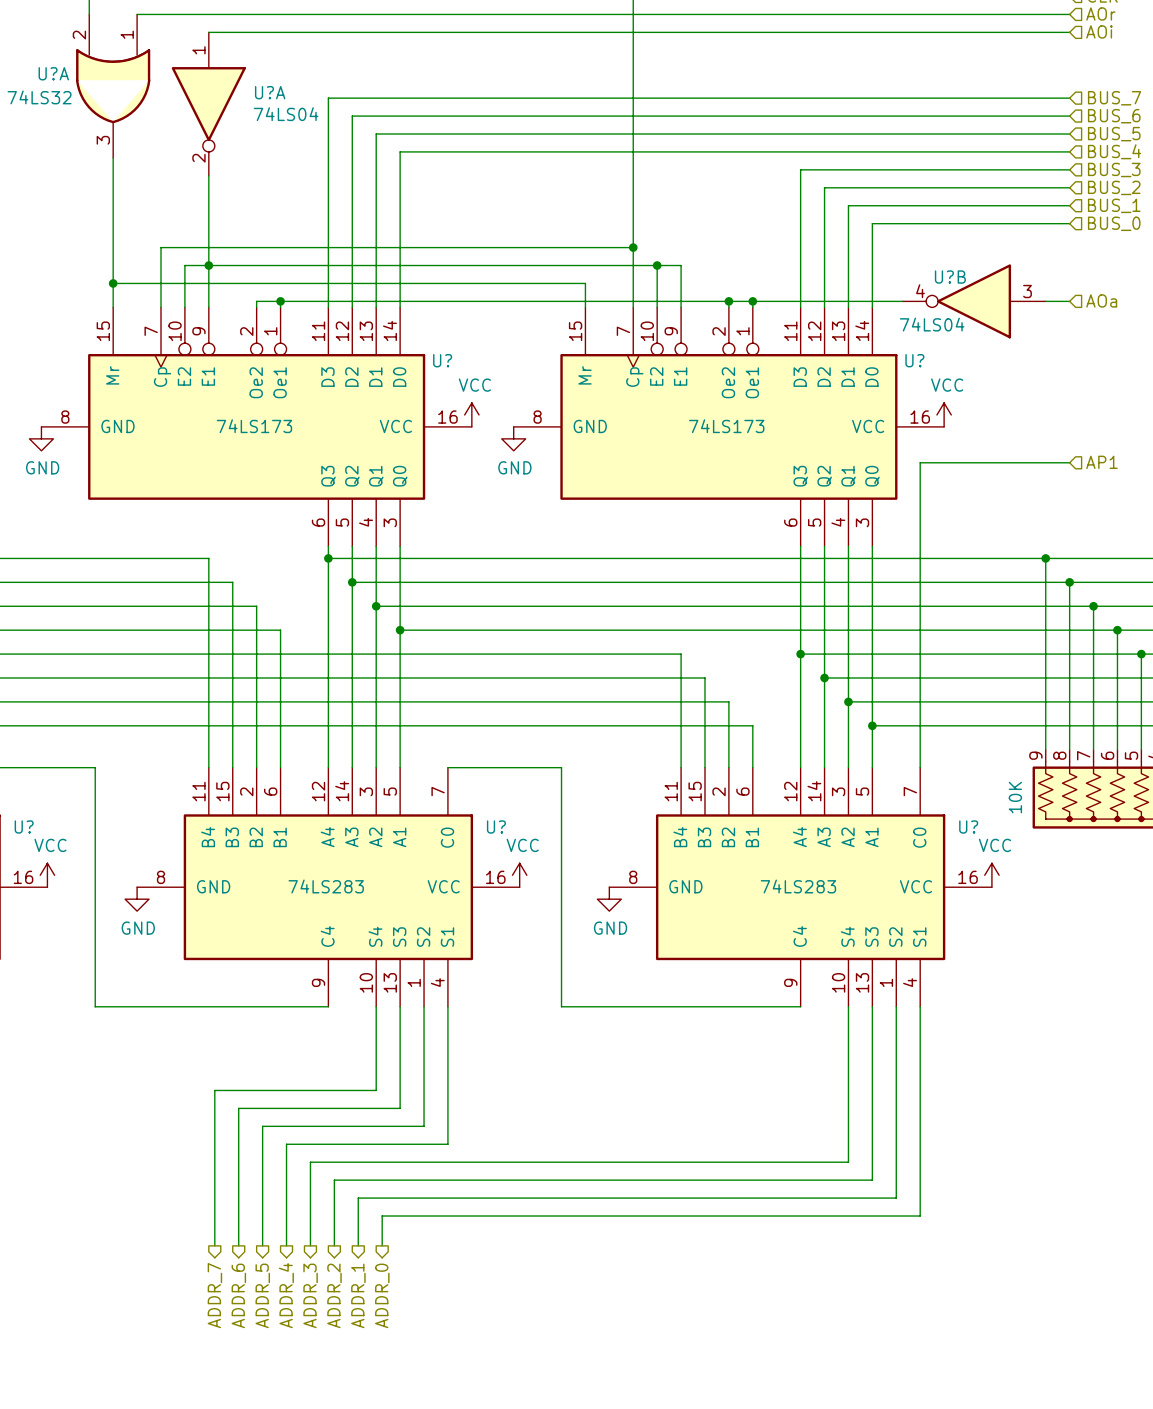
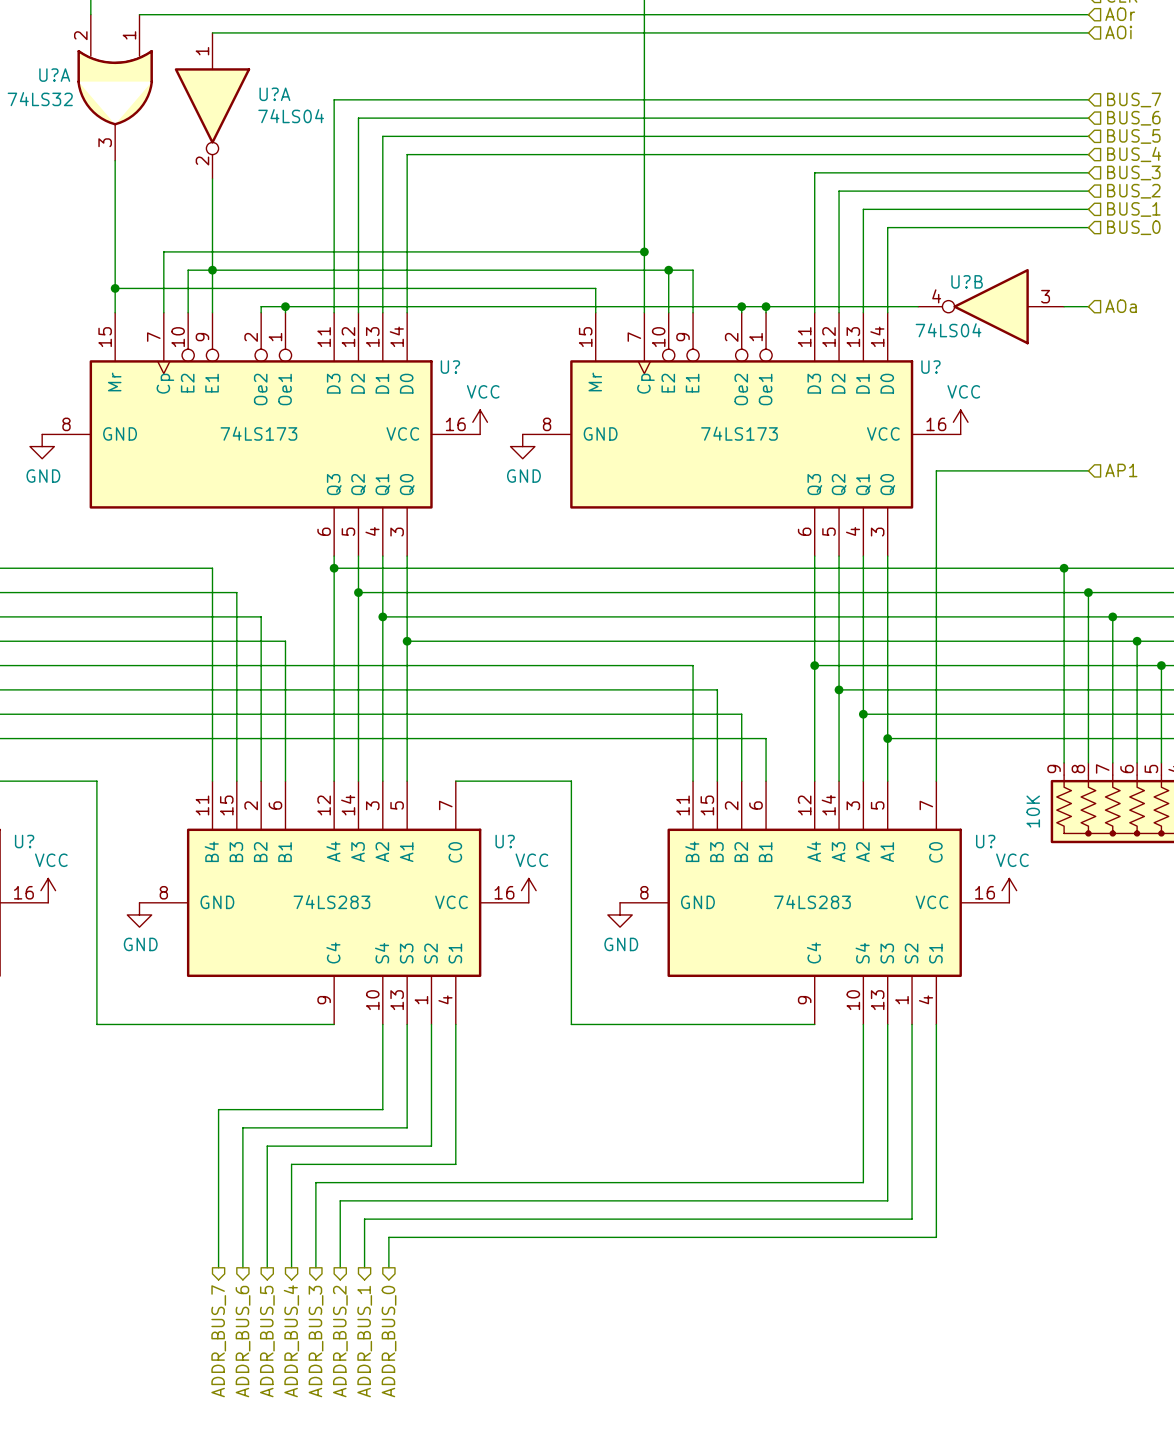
hierarchical label: ADDR_7 (214, 1295) -> ADDR_BUS_7 (218, 1341)
hierarchical label: ADDR_6 (238, 1295) -> ADDR_BUS_6 (243, 1341)
hierarchical label: ADDR_5 (262, 1295) -> ADDR_BUS_5 (267, 1341)
hierarchical label: ADDR_4 (286, 1295) -> ADDR_BUS_4 (291, 1341)
hierarchical label: ADDR_3 (310, 1295) -> ADDR_BUS_3 (316, 1341)
hierarchical label: ADDR_2 (334, 1295) -> ADDR_BUS_2 (340, 1341)
hierarchical label: ADDR_1 (358, 1295) -> ADDR_BUS_1 (364, 1341)
hierarchical label: ADDR_0 (382, 1295) -> ADDR_BUS_0 (389, 1341)

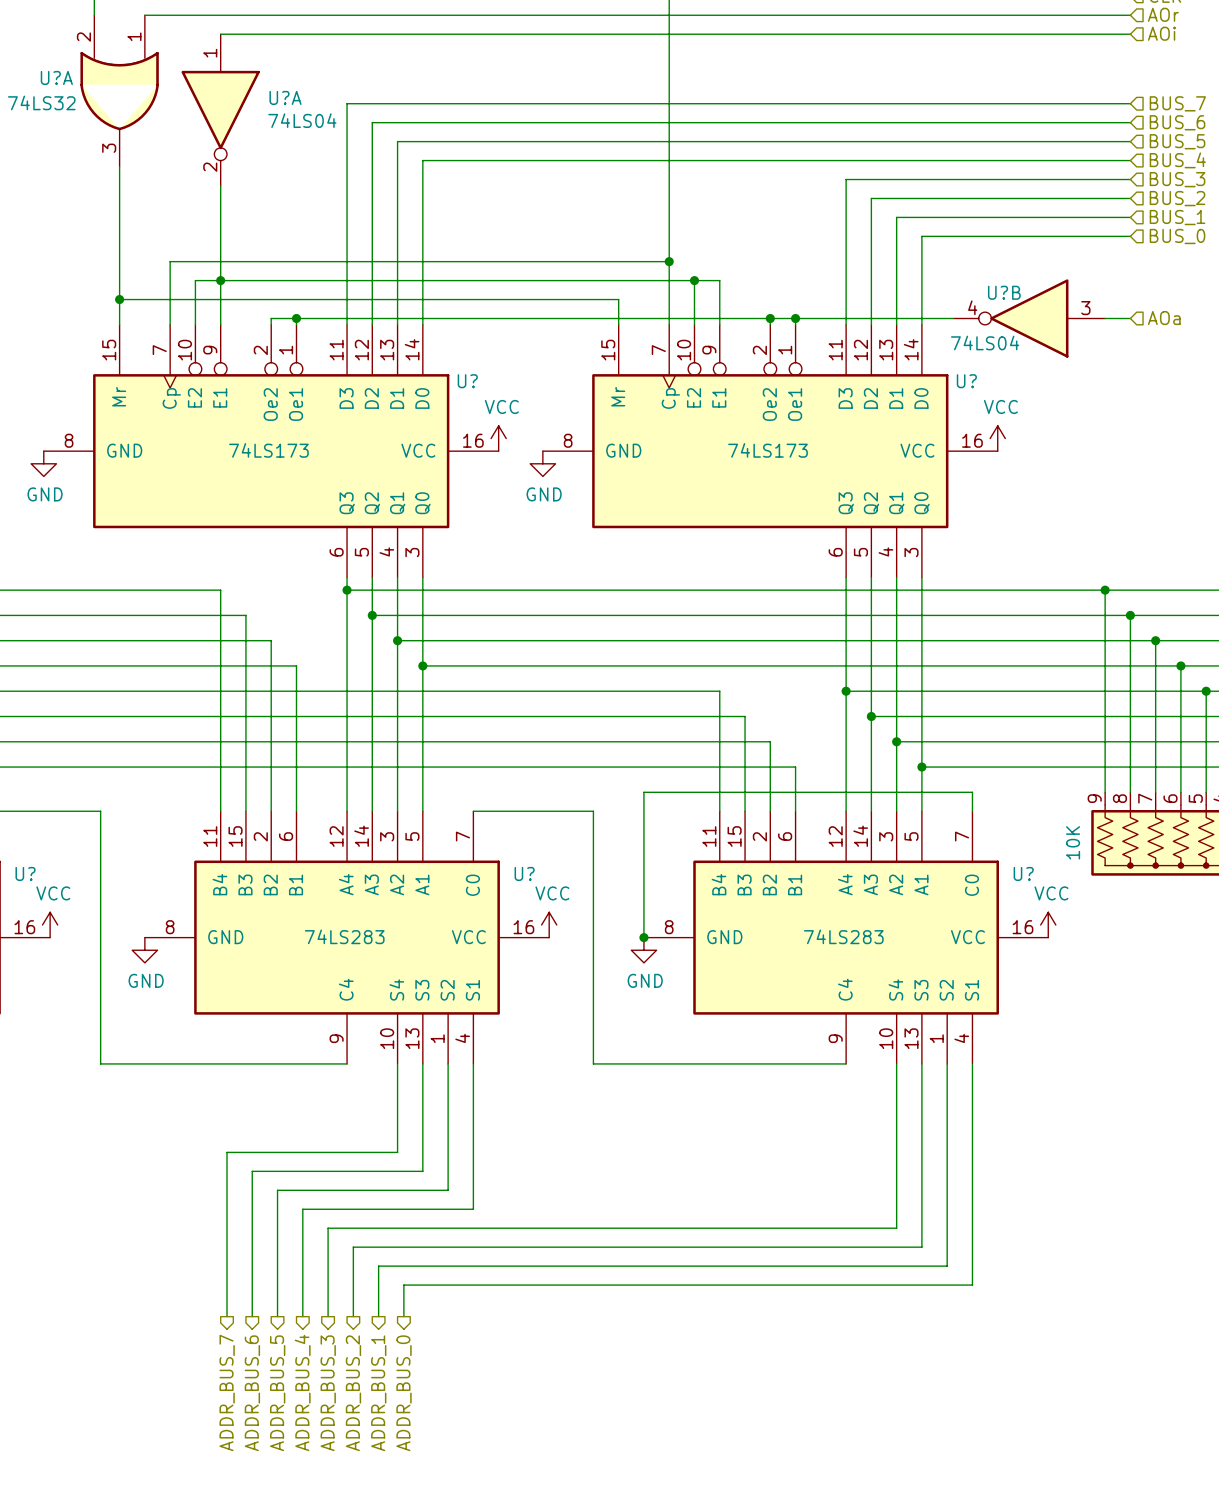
wire: (1088, 470) (936, 470) (936, 762) -> (643, 937) (643, 792) (972, 792)
hierarchical label: AP1 (1121, 470) -> none
junction: none -> (643, 937)

